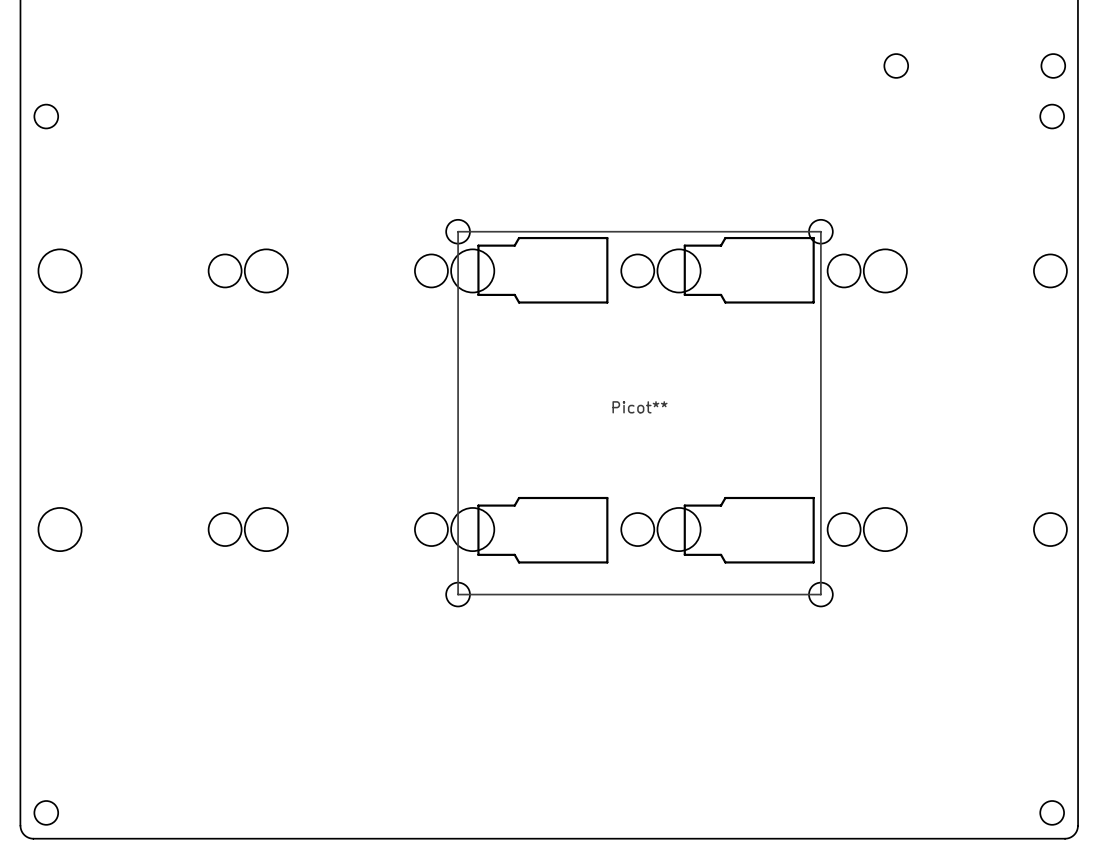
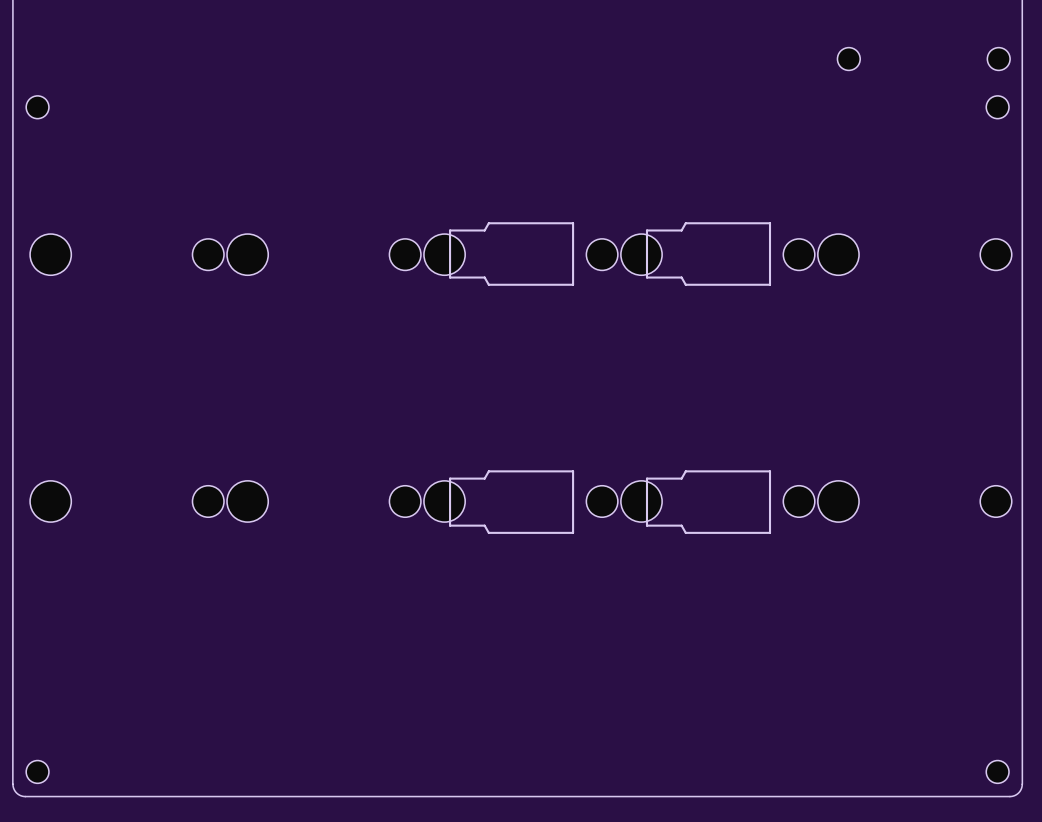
Picot**: (639, 413) -> none

